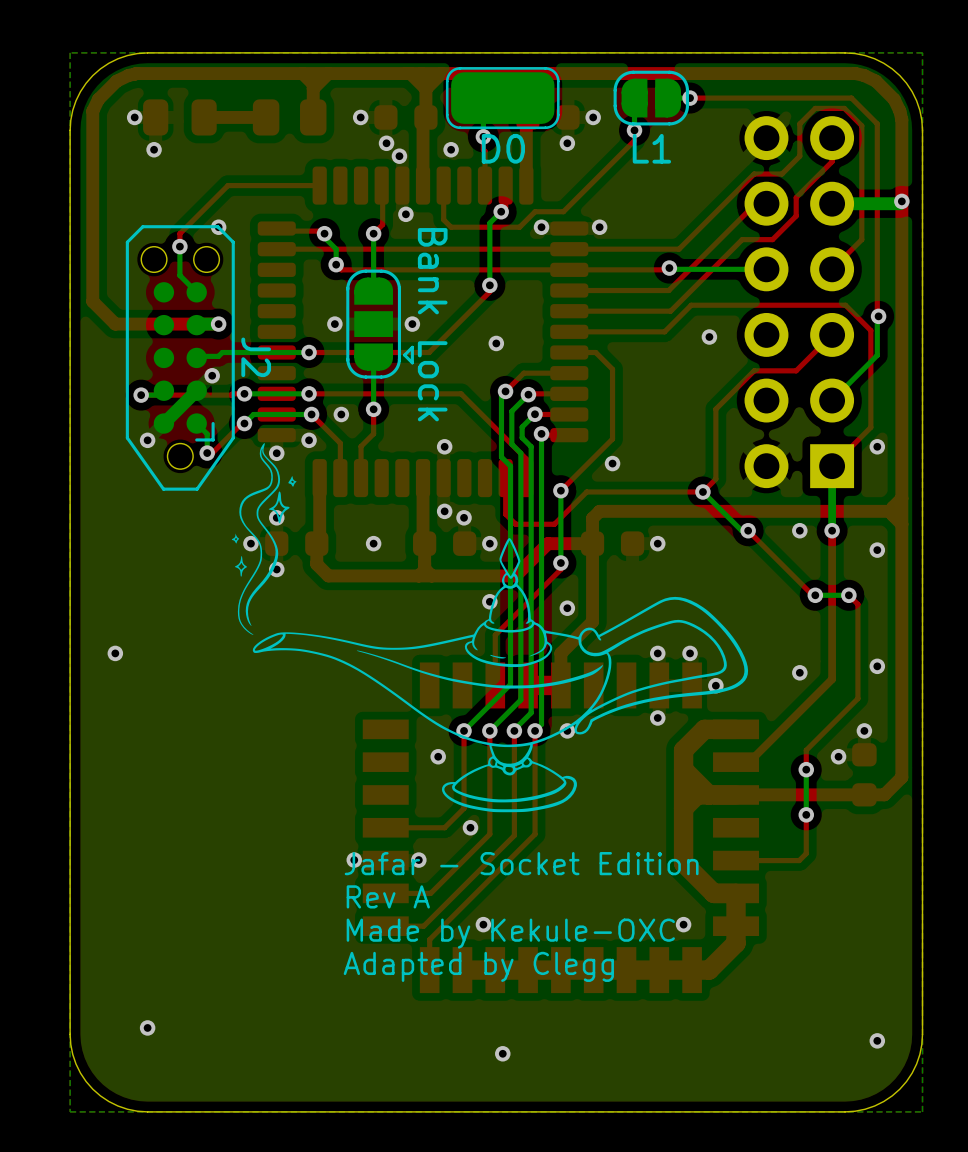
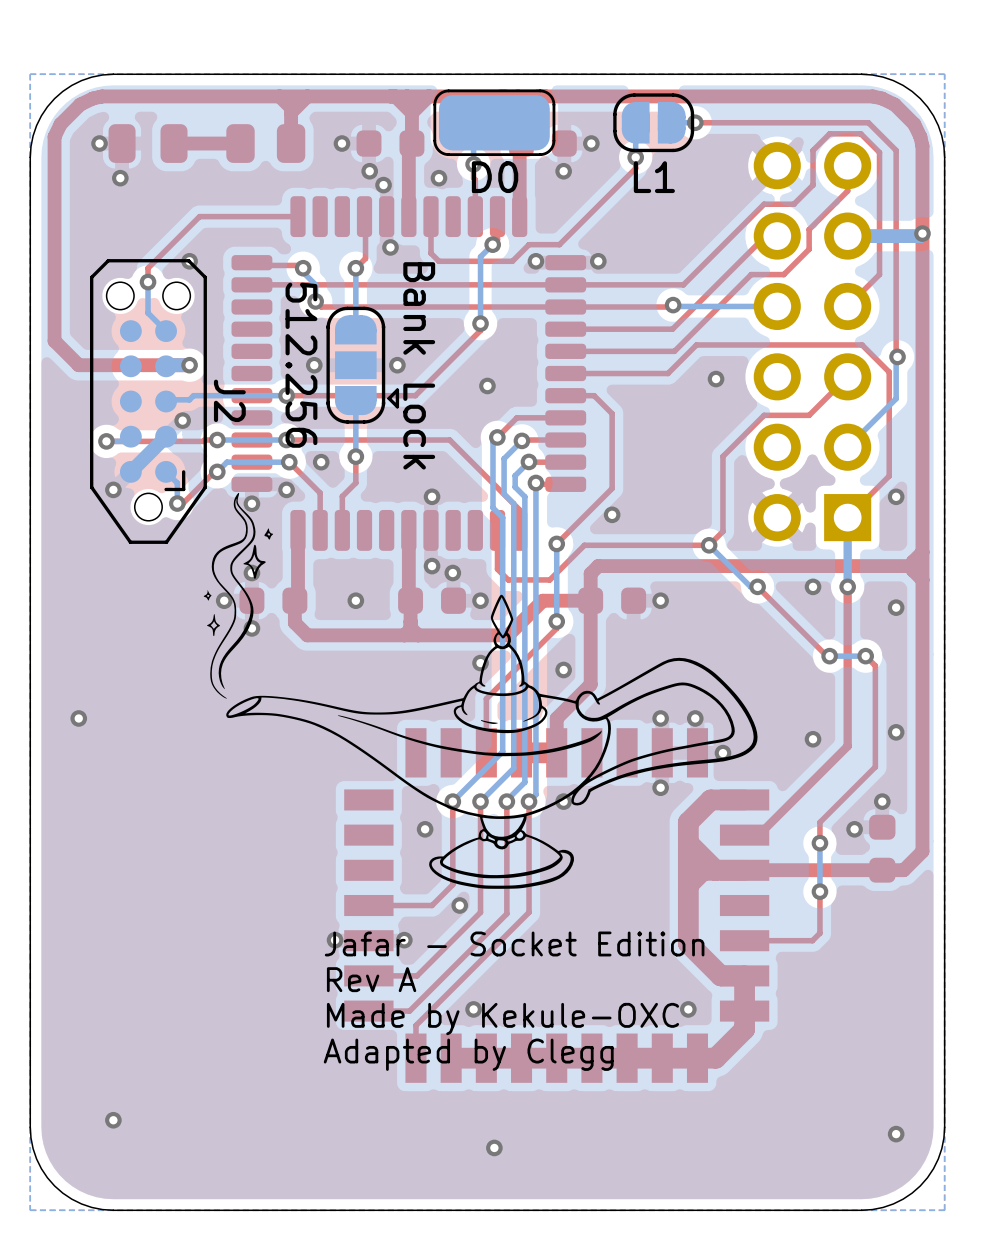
part text: none -> 512.256 (301, 365)

